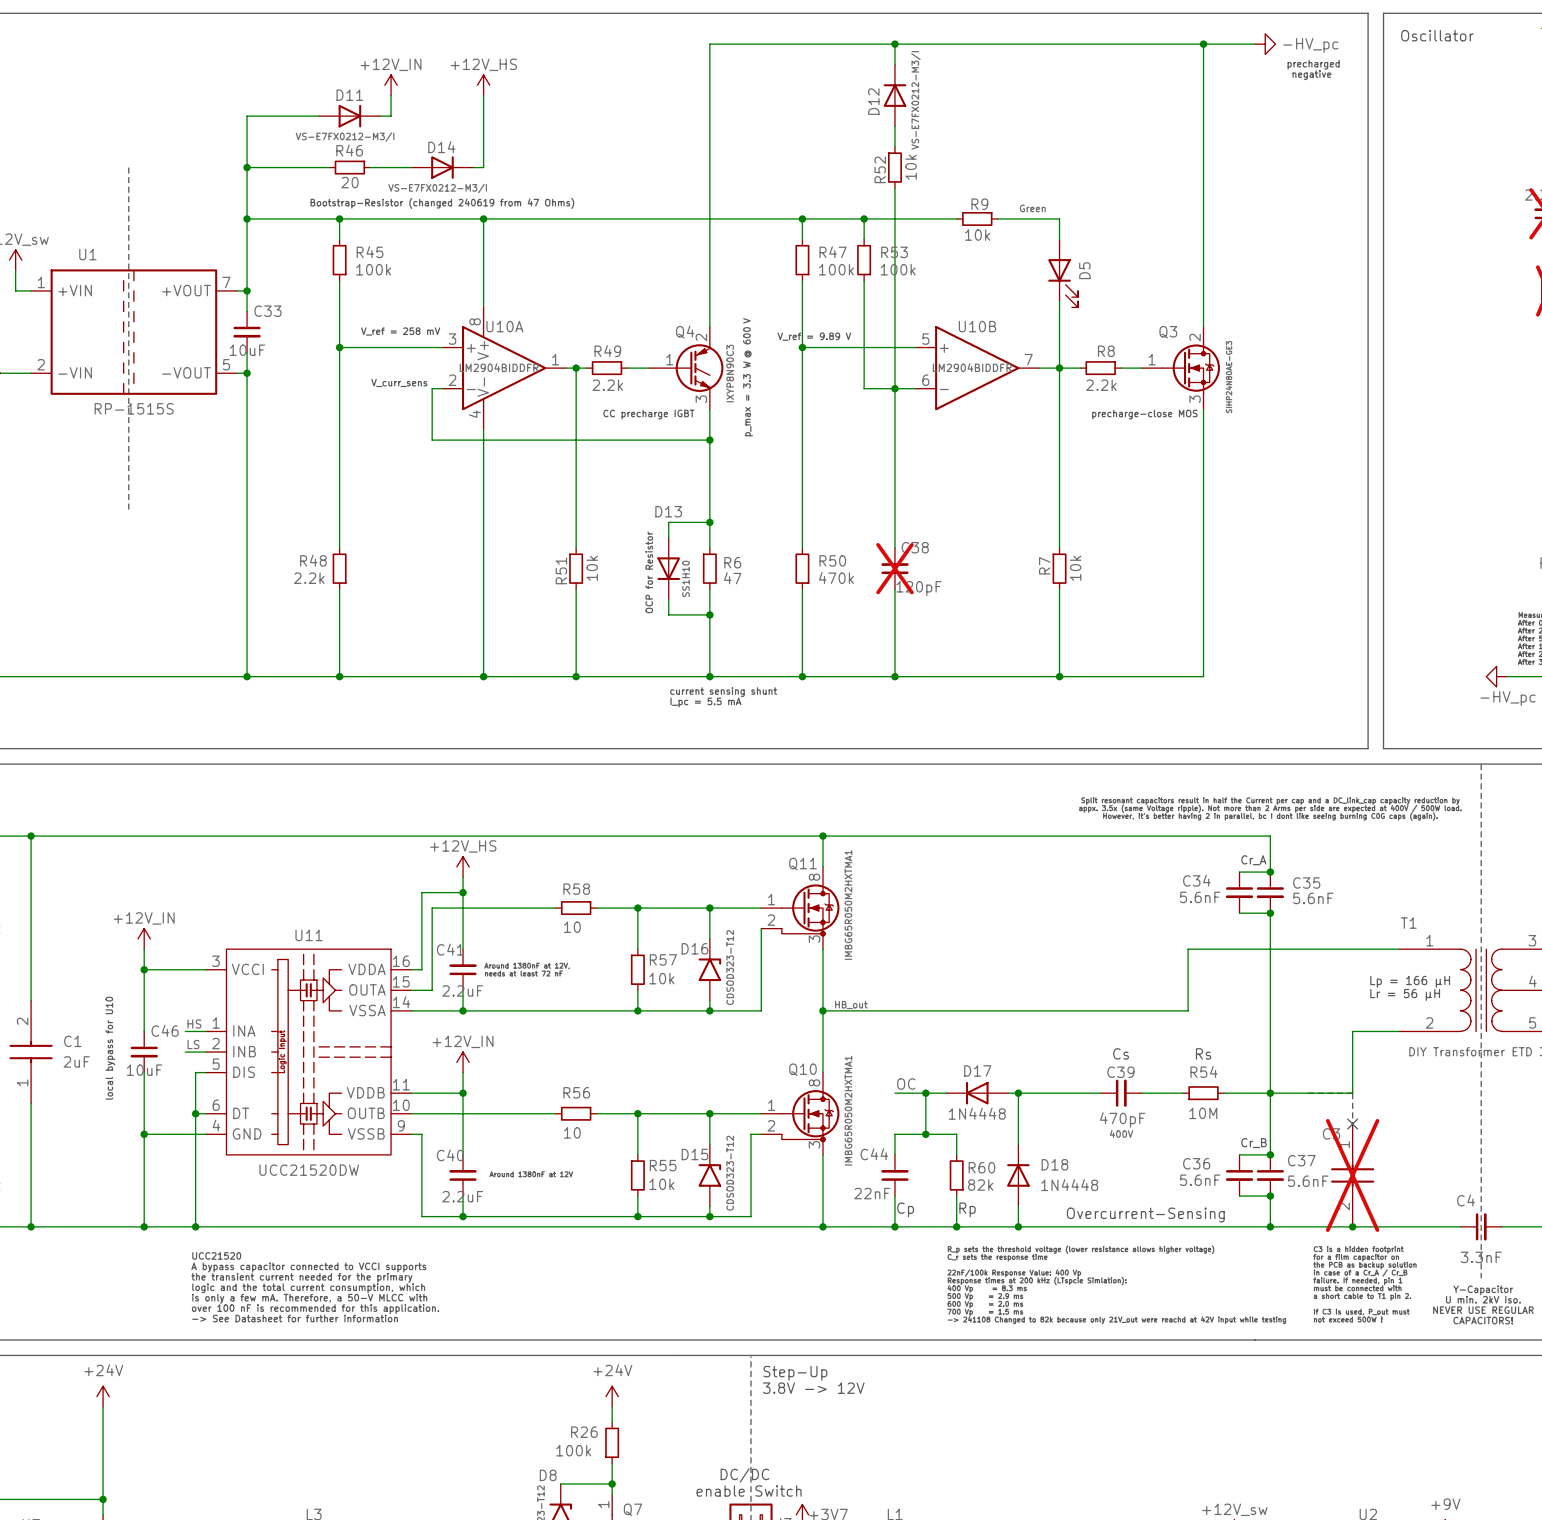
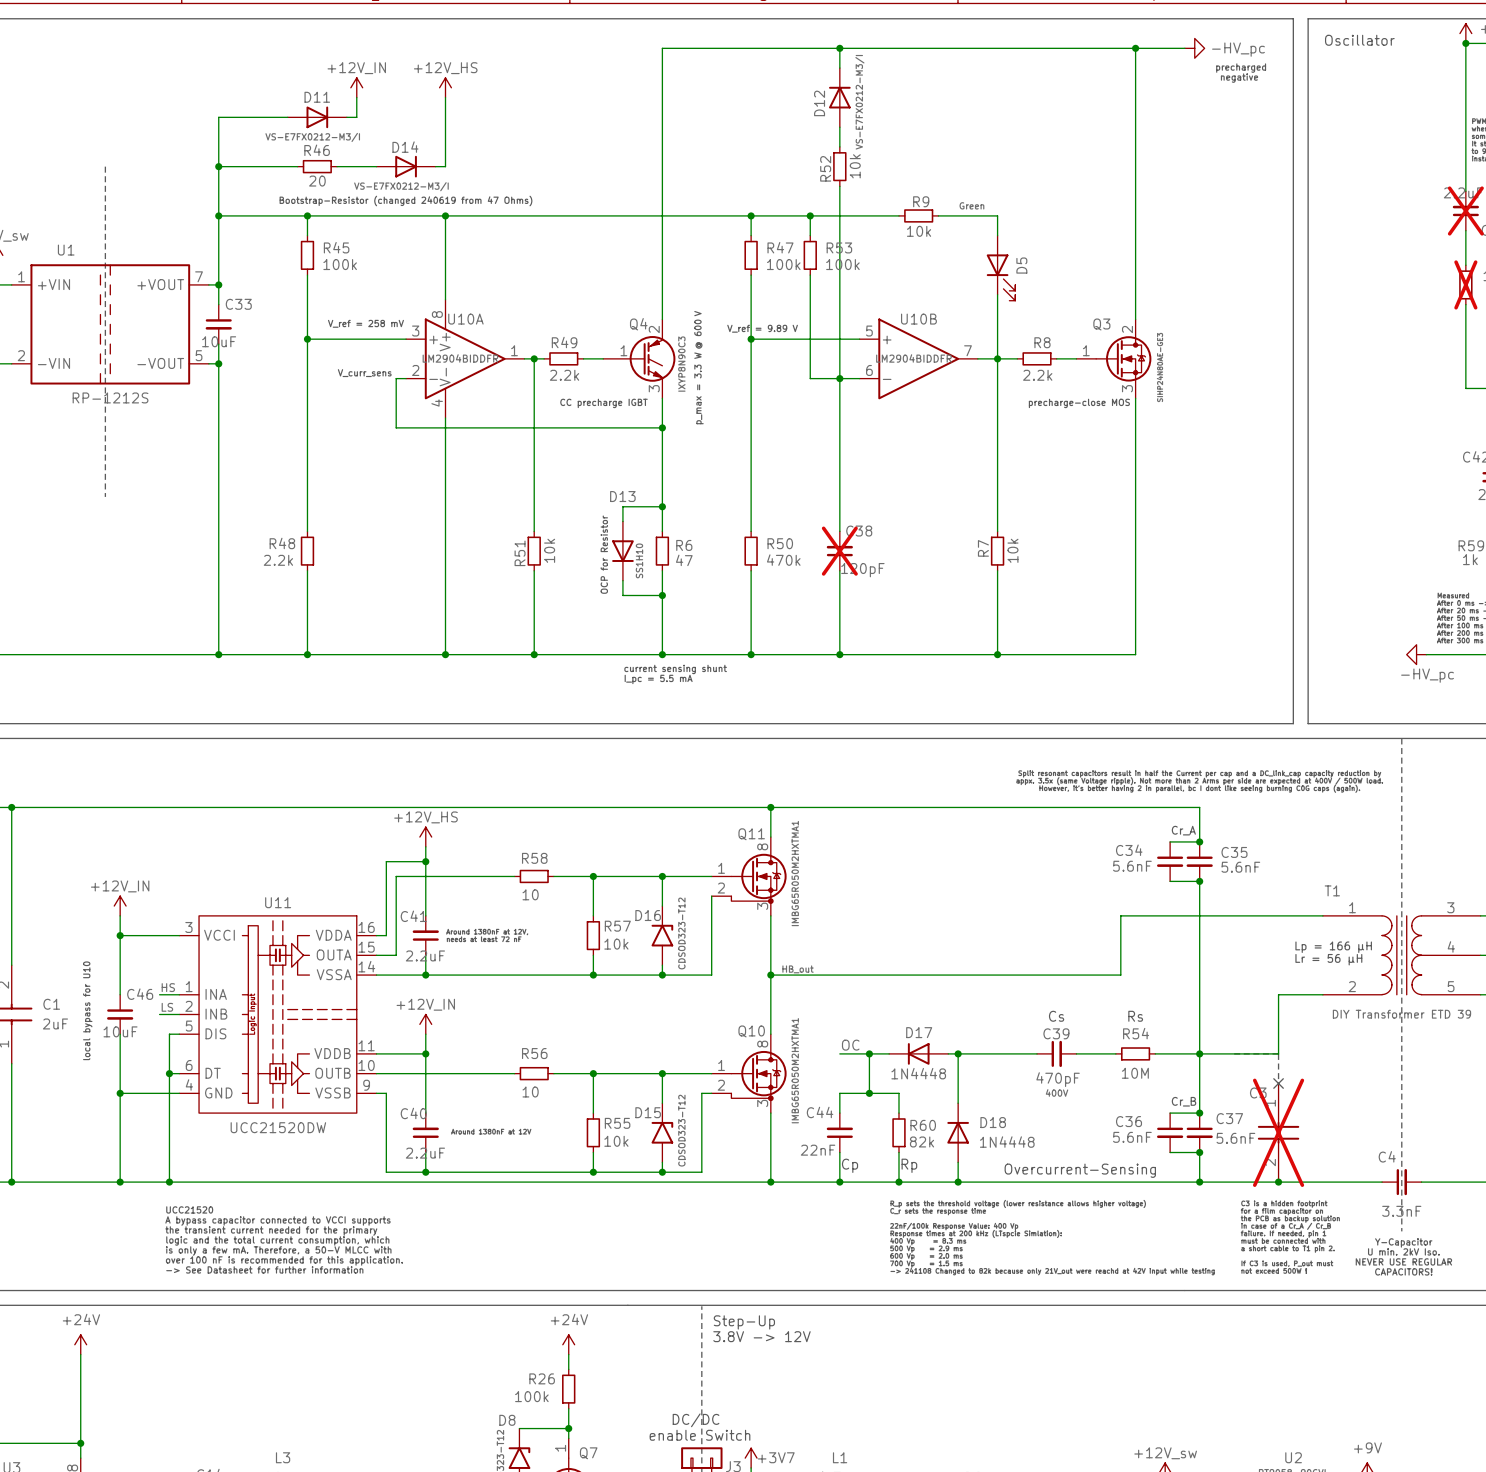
U1 value: RP-1515S (134, 408) -> RP-1212S (110, 397)

